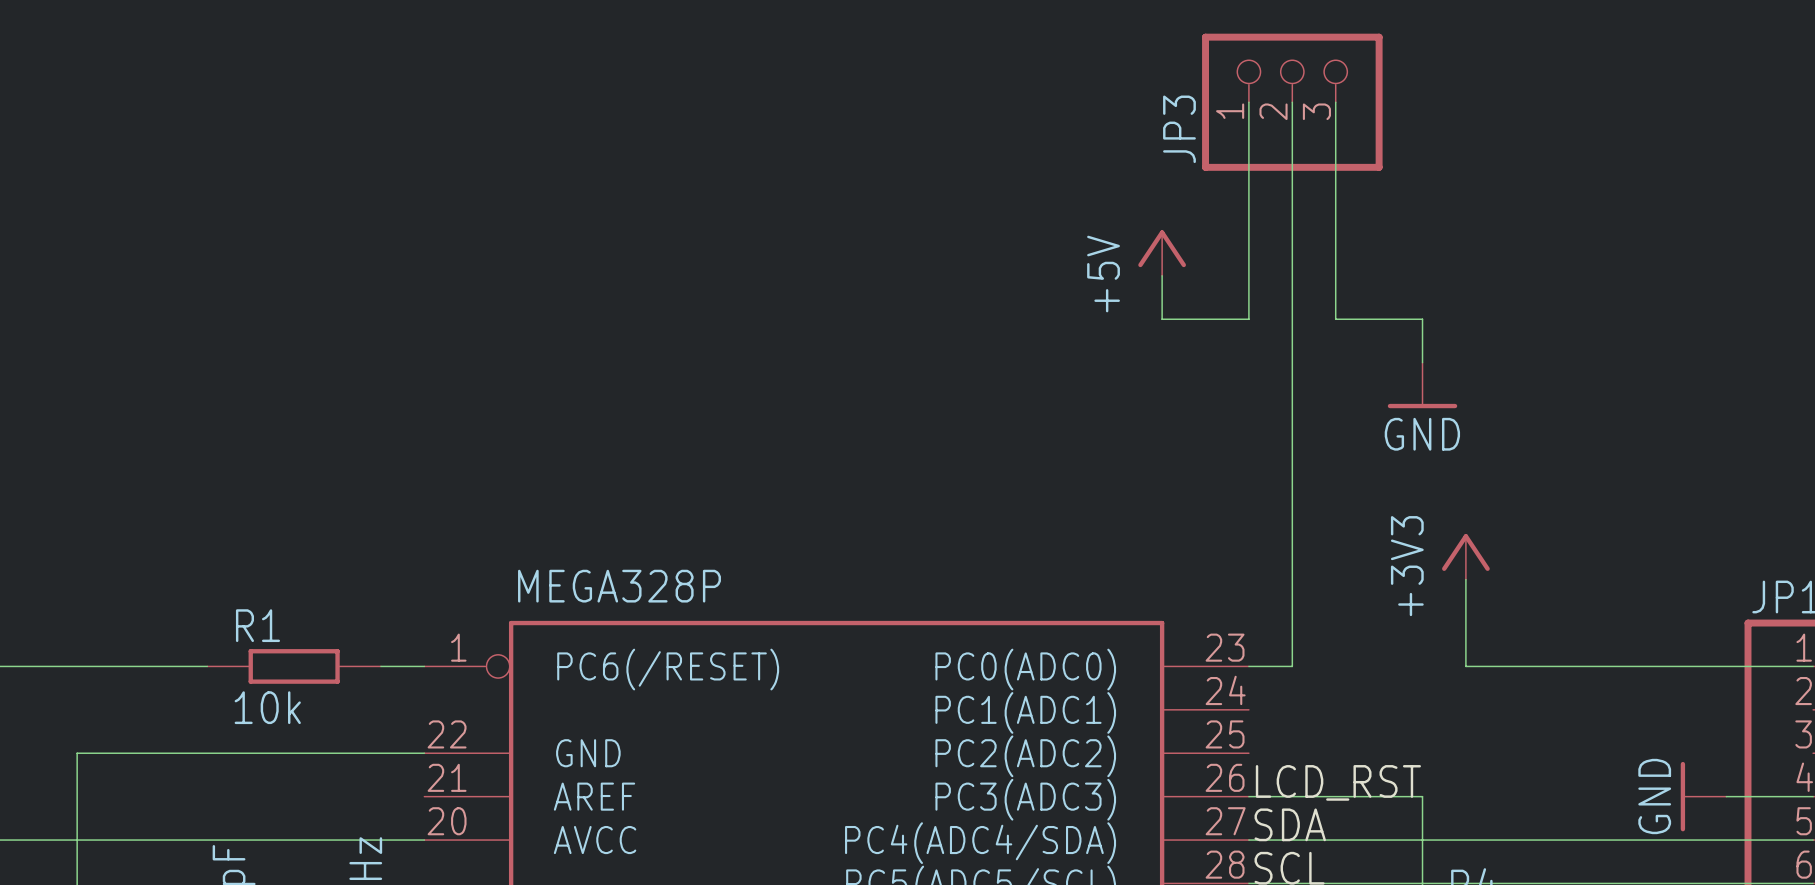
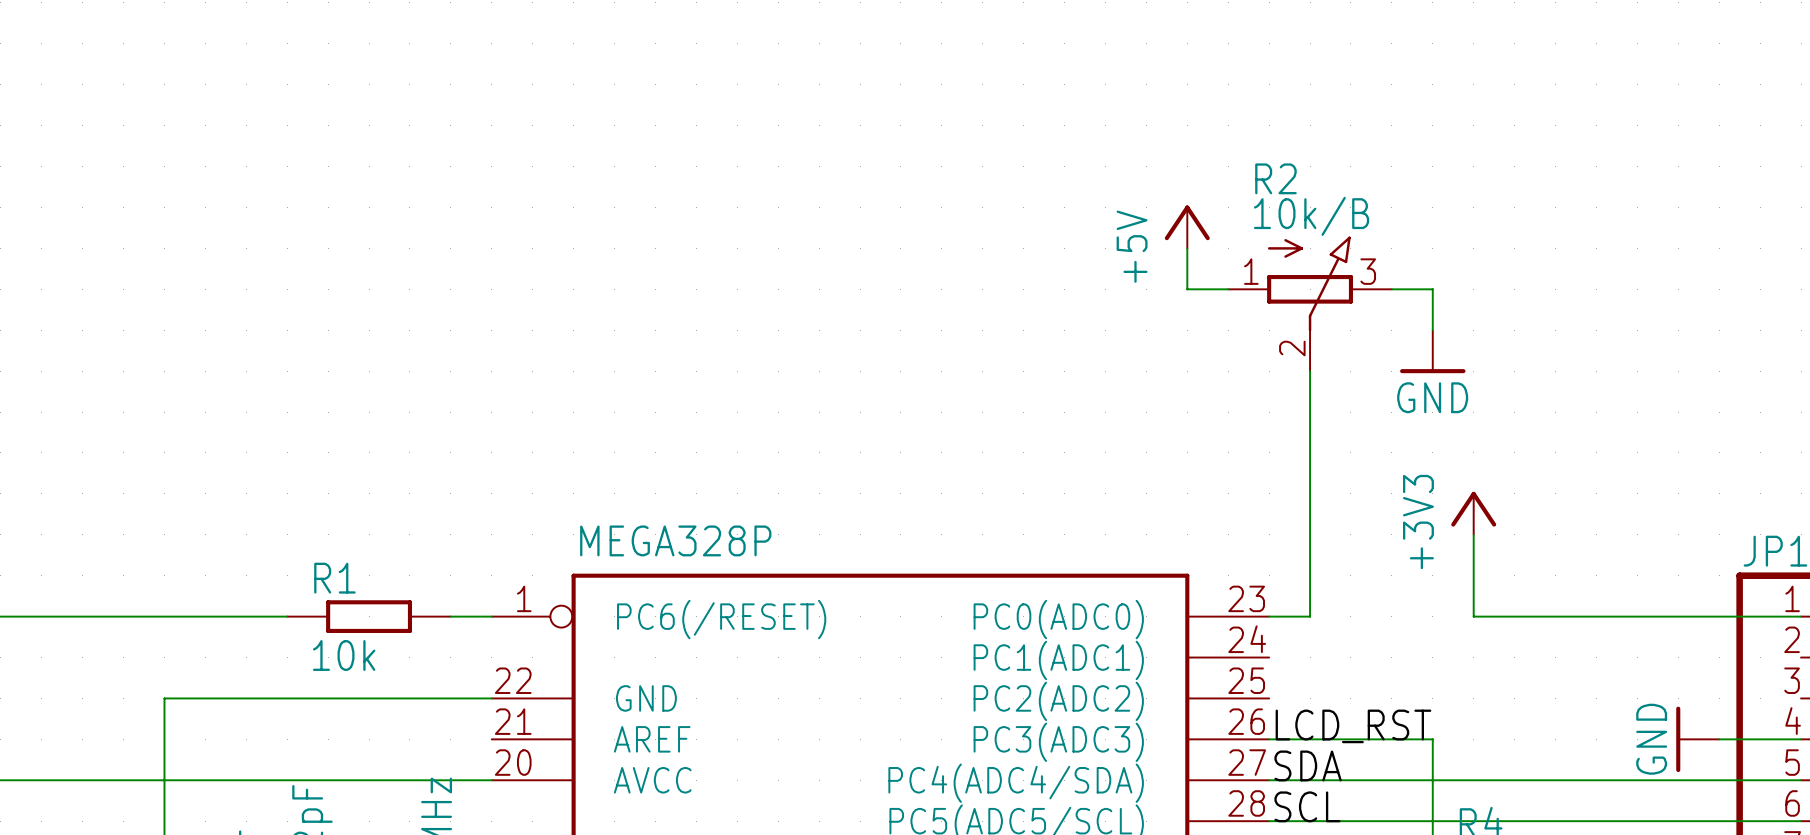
wire: (1248, 102) (1248, 319) (1205, 319) -> none
wire: (1292, 102) (1292, 406) -> none
JP3: (1292, 102) -> none
wire: (1335, 102) (1335, 319) (1379, 319) -> none
R2: none -> 10k/B (1310, 303)

